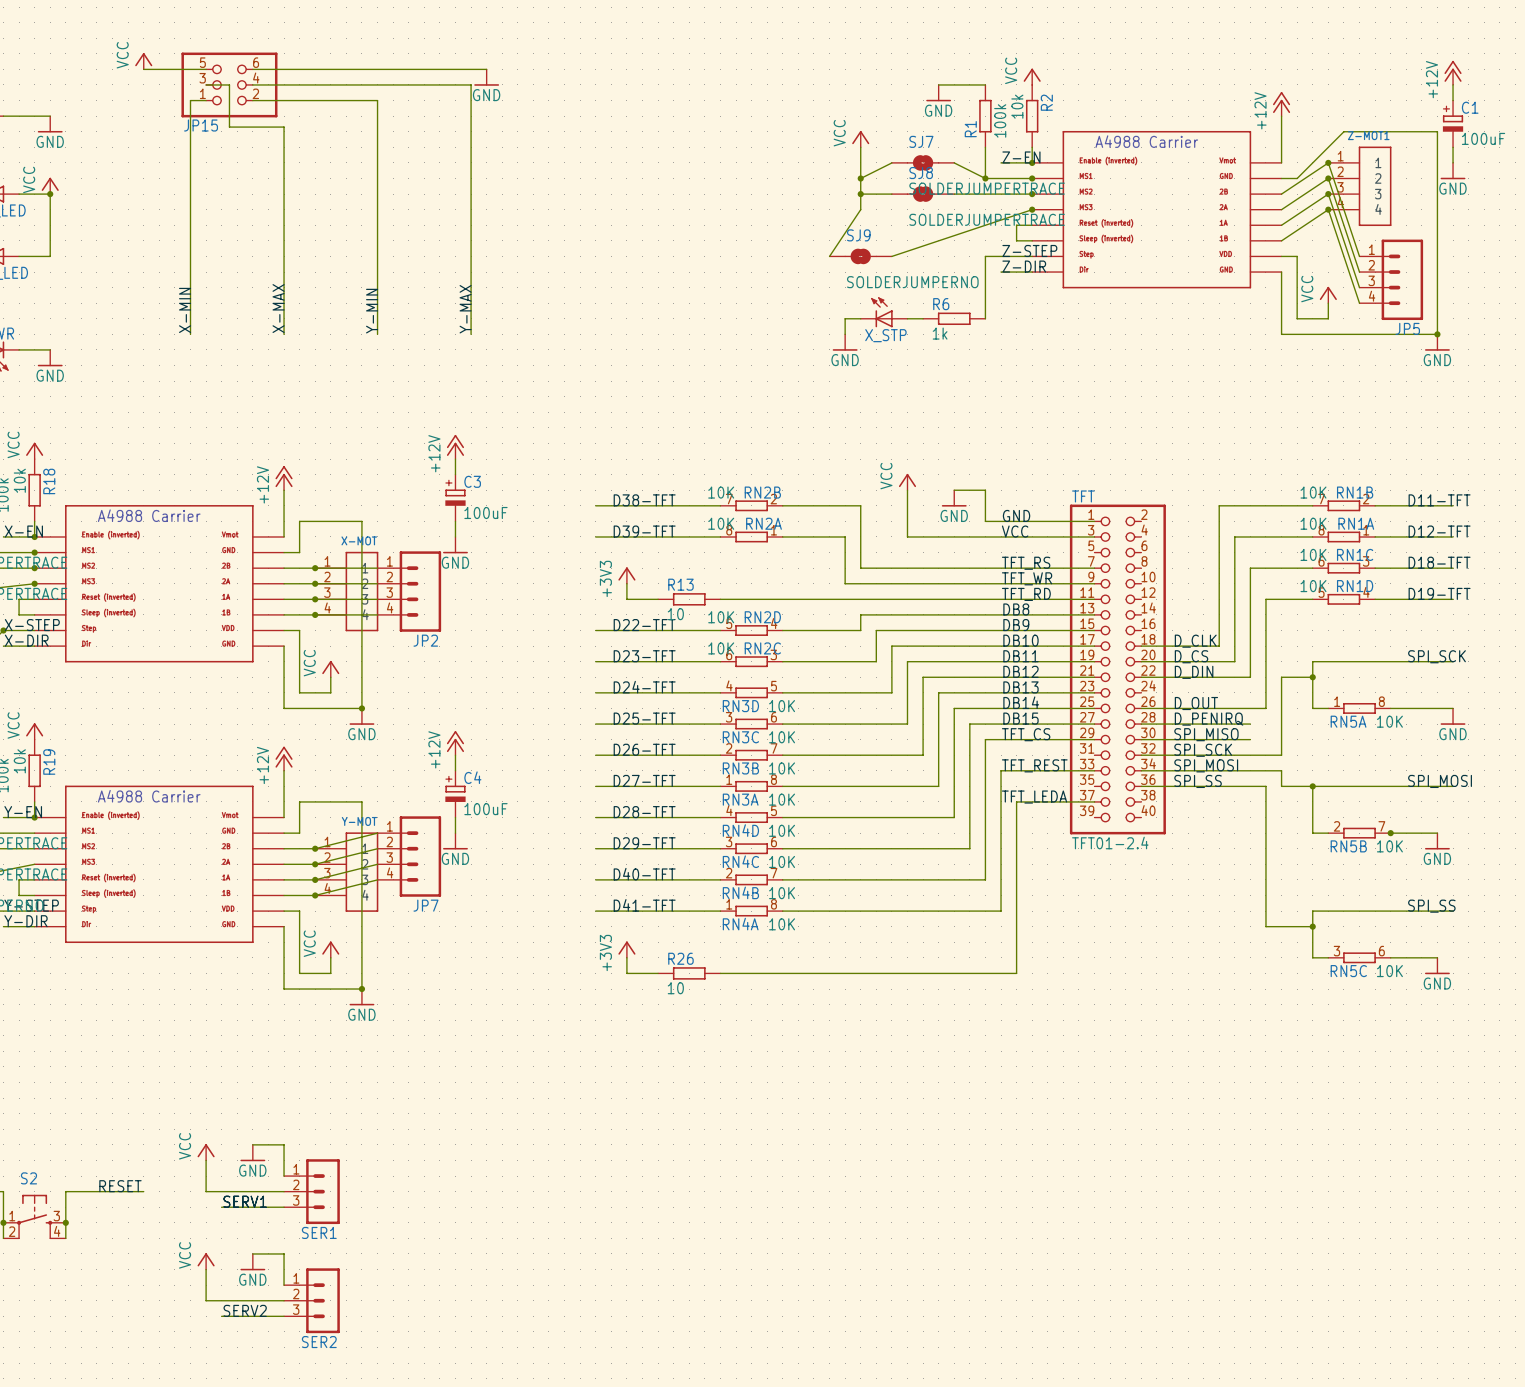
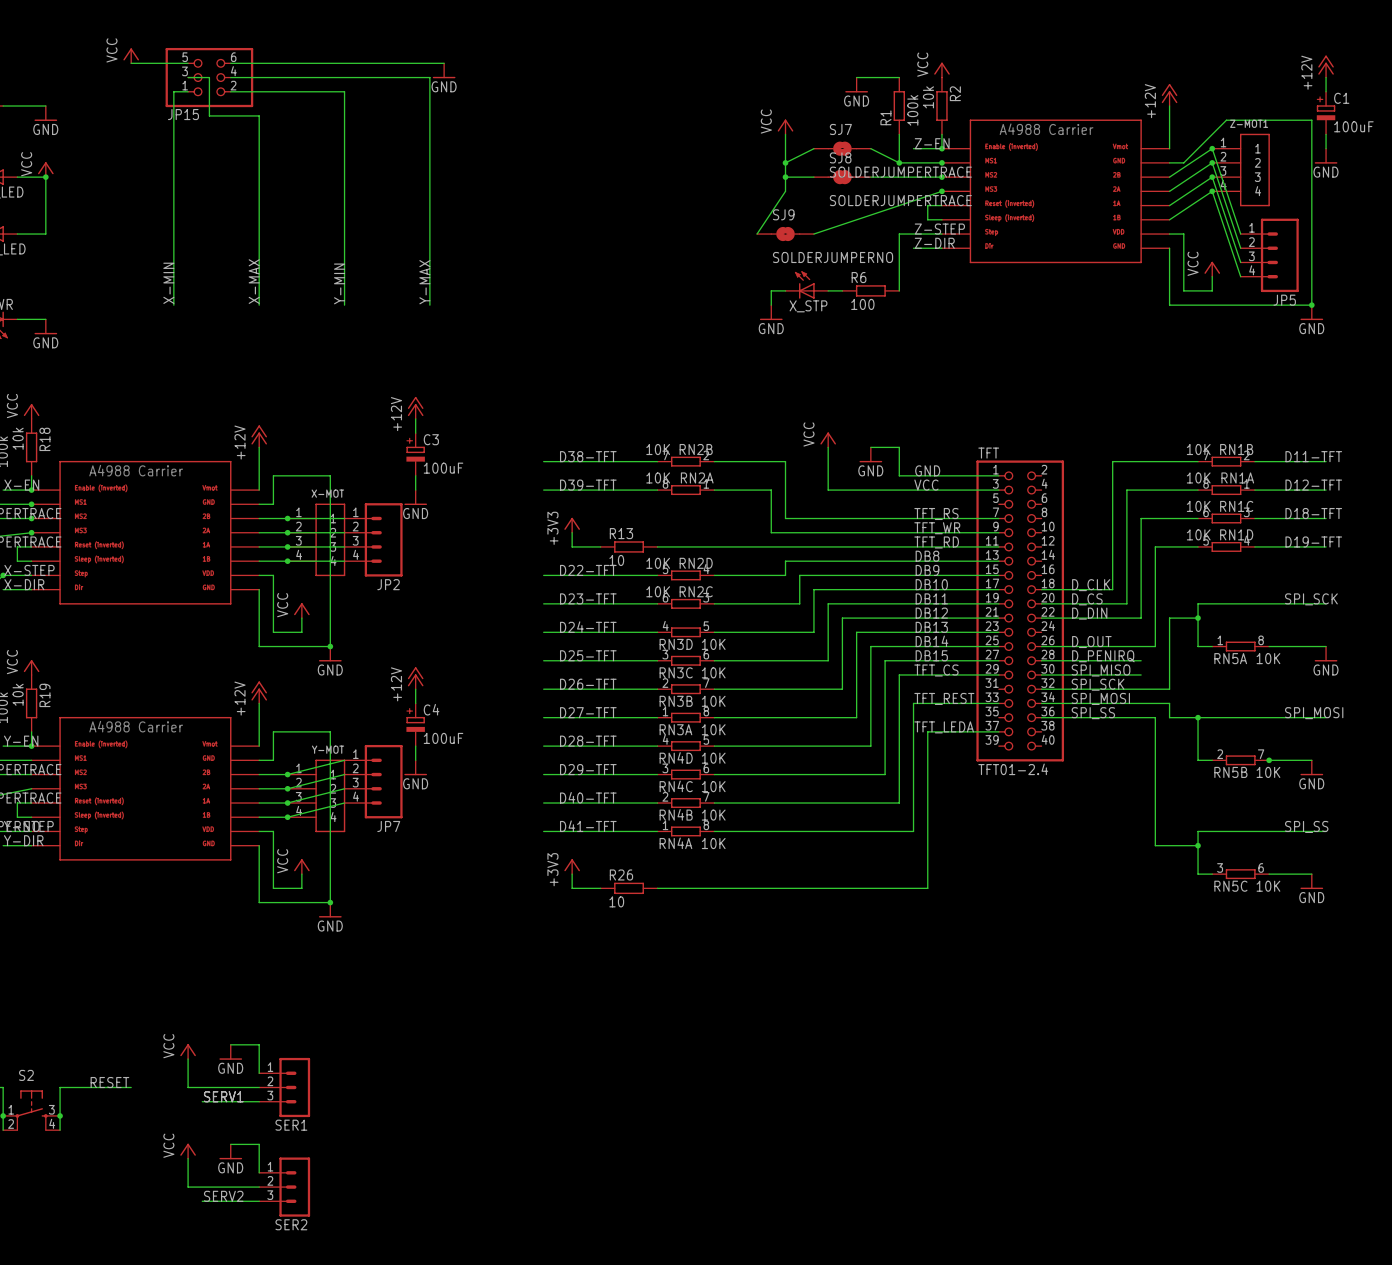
R6 value: 1k (940, 333) -> 100 (862, 304)

